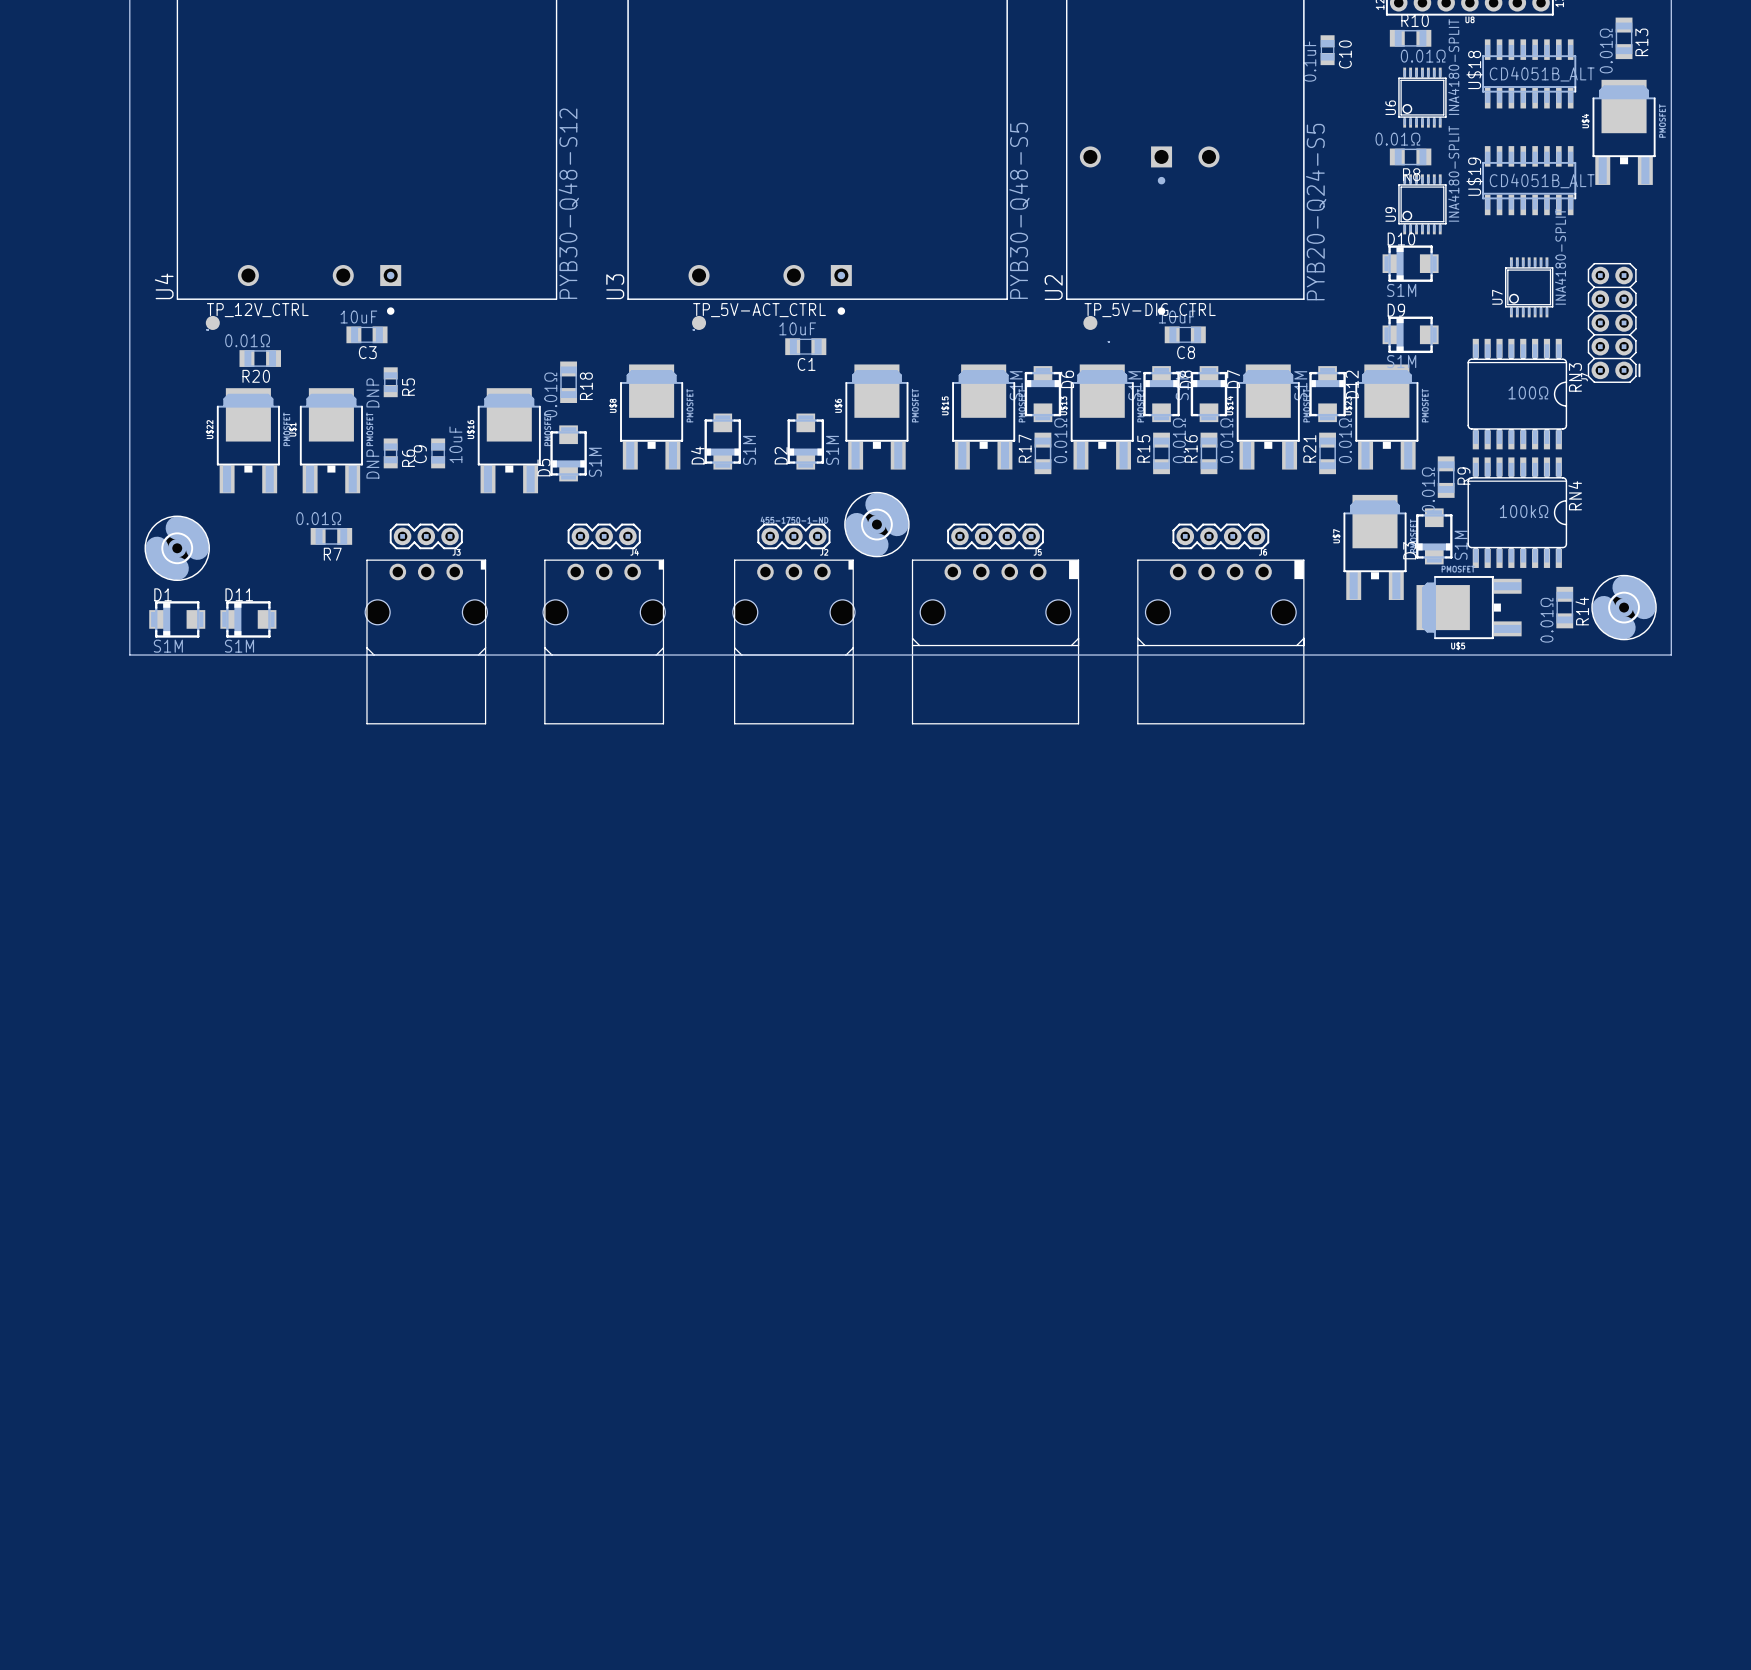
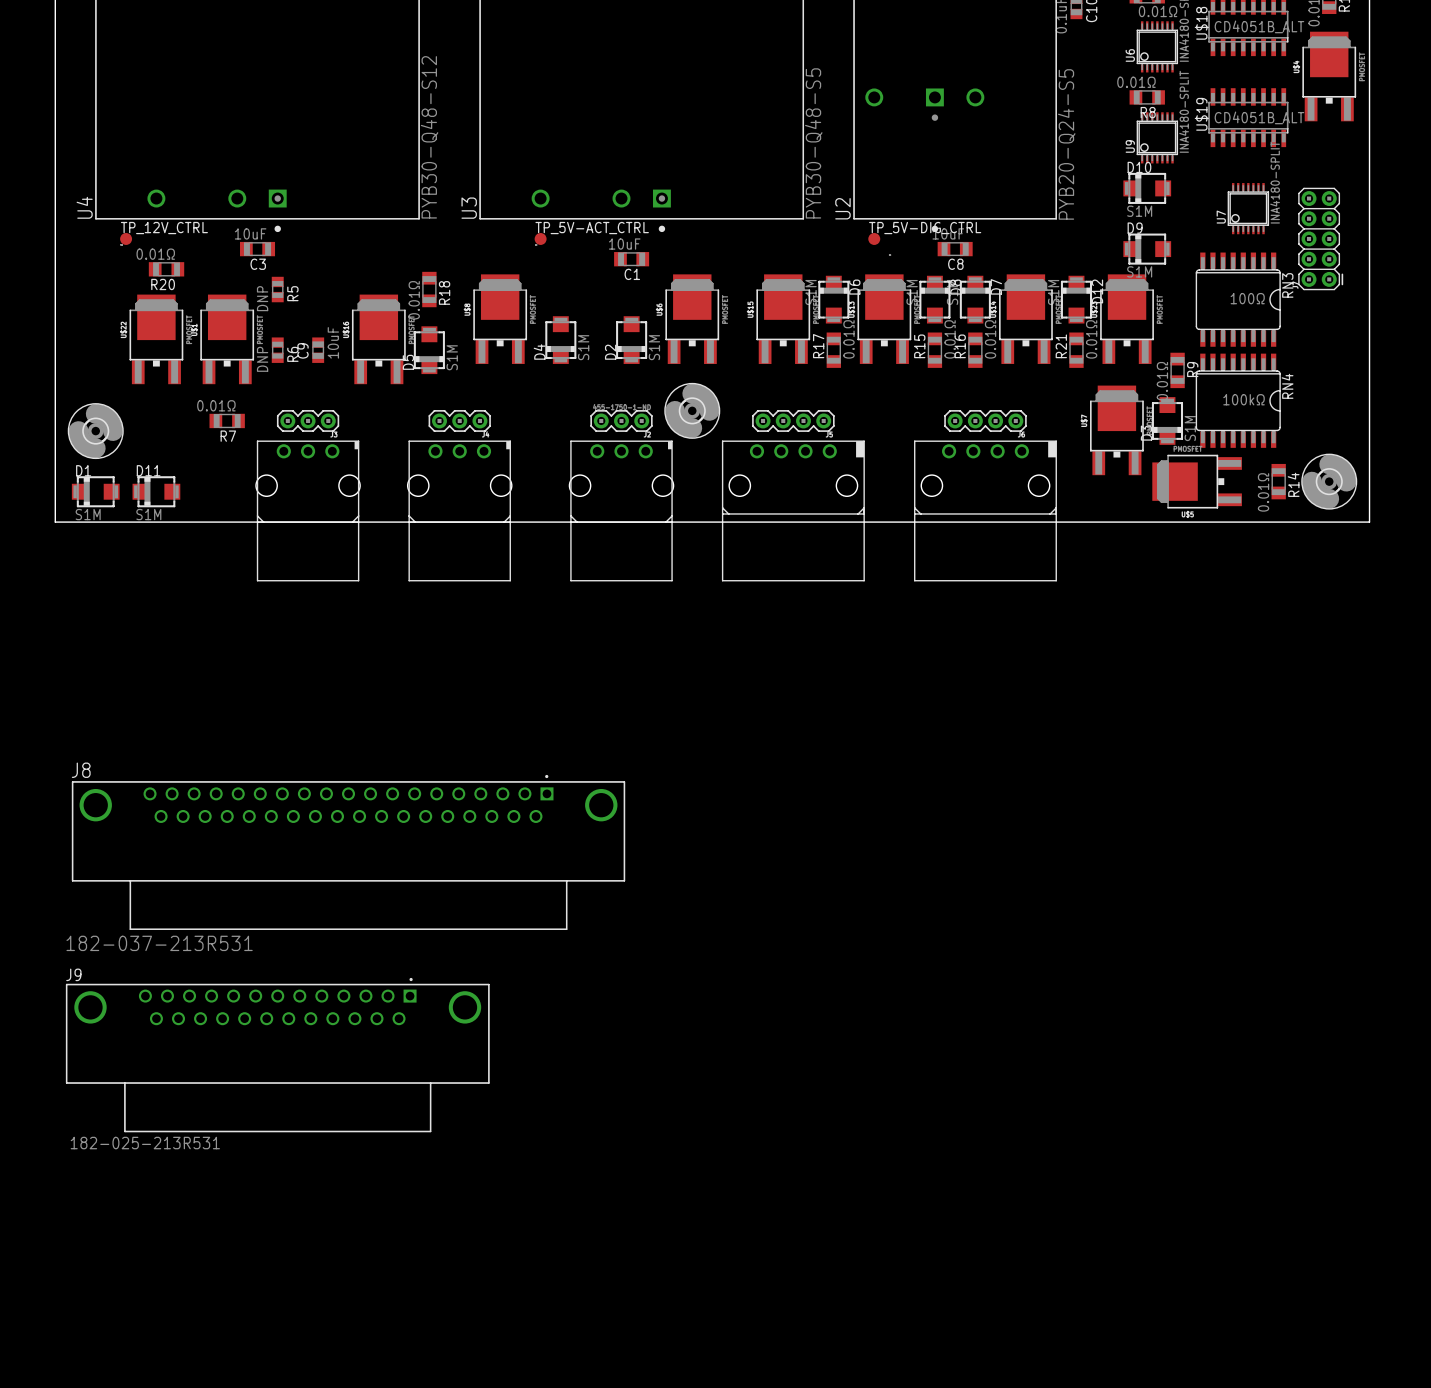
J8: none -> 182-037-213R531 (348, 852)
J9: none -> 182-025-213R531 (277, 1054)

